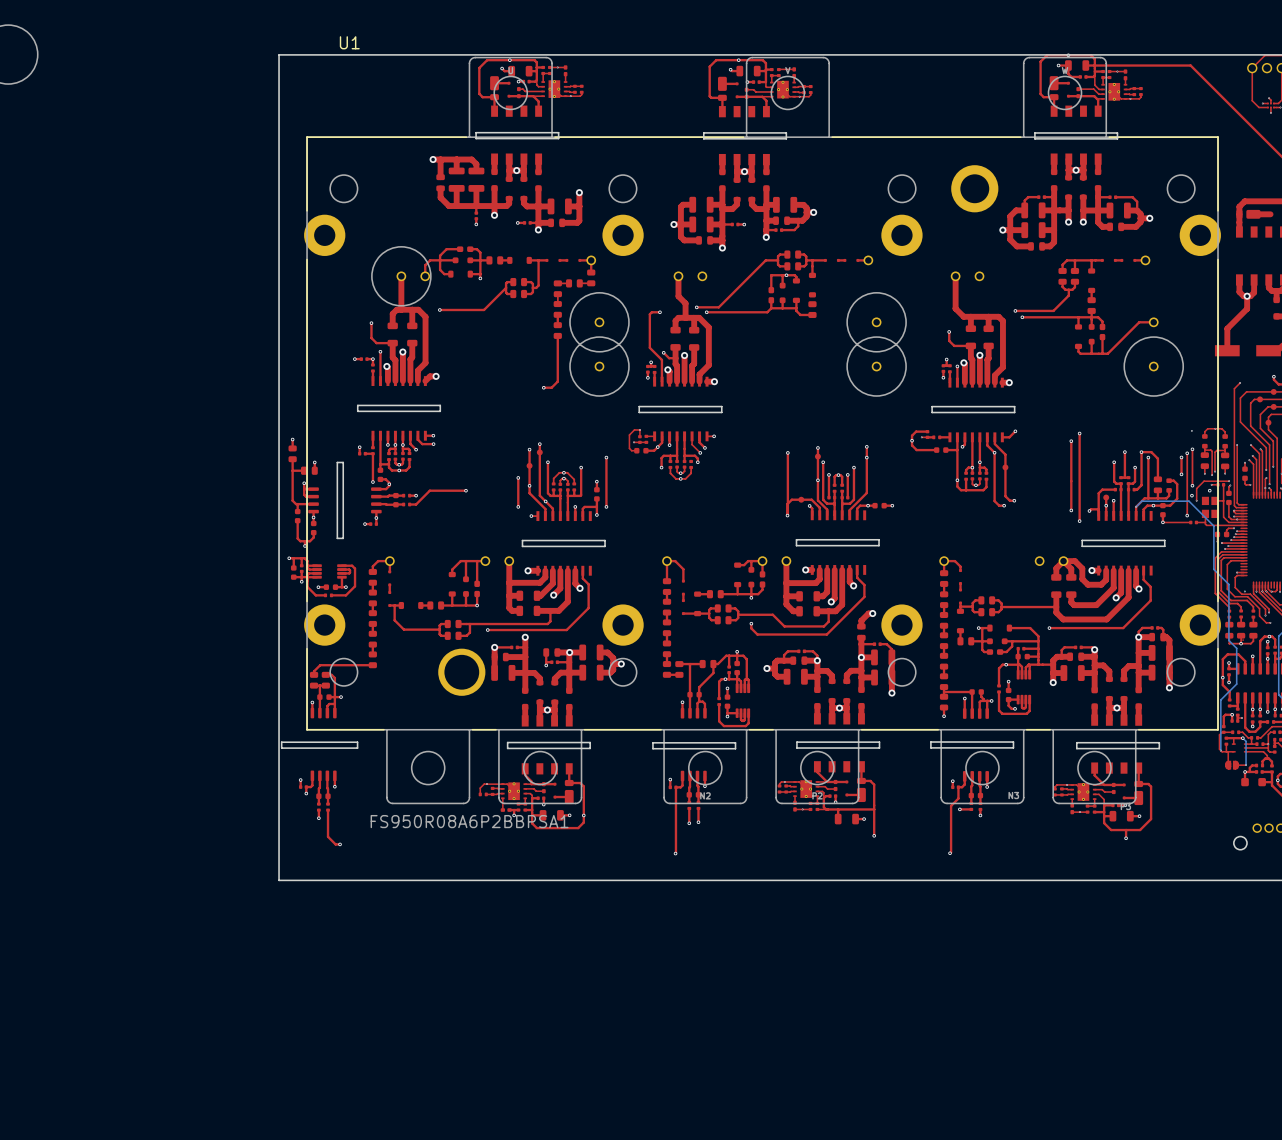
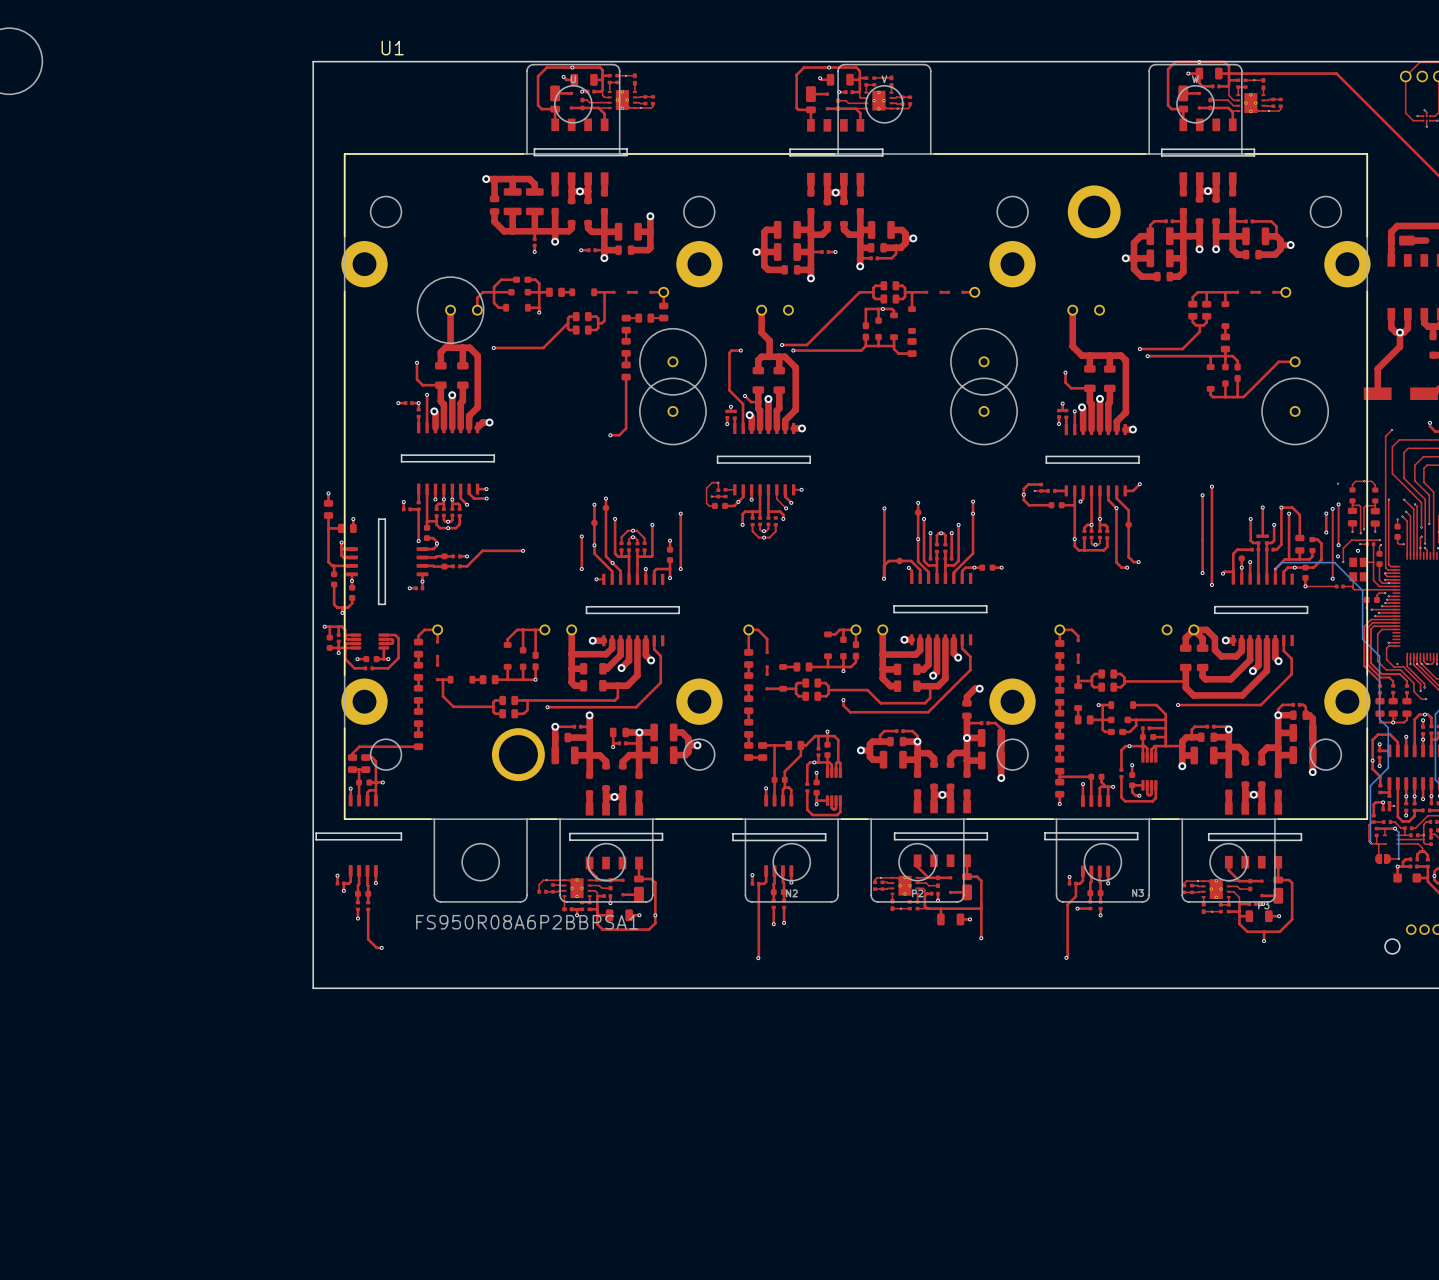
part: (1273, 391) -> none
part: (1260, 399) -> none
part: (1273, 406) -> none
part: (1268, 422) -> none

